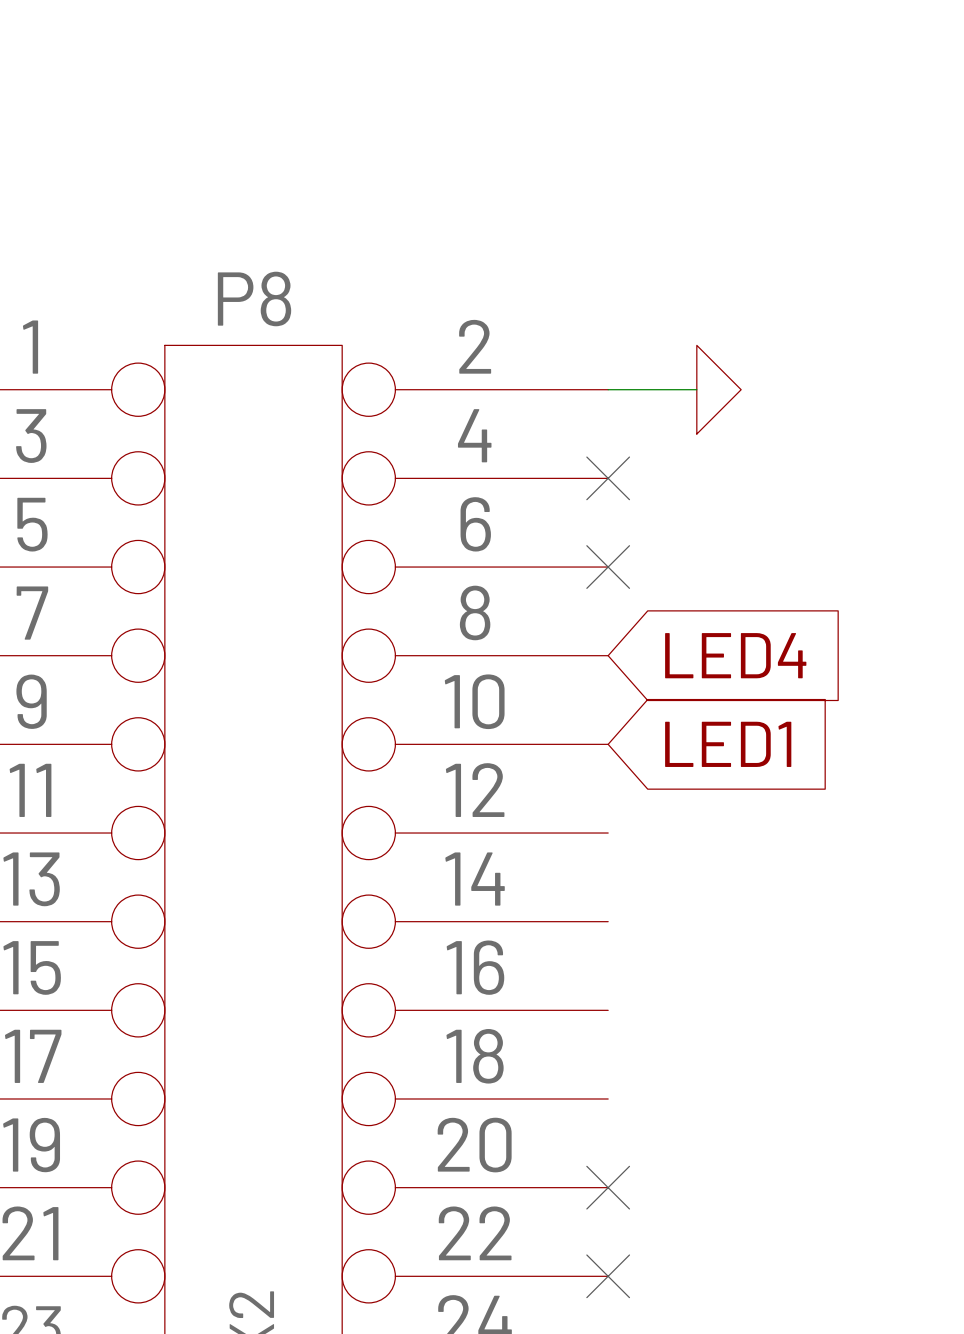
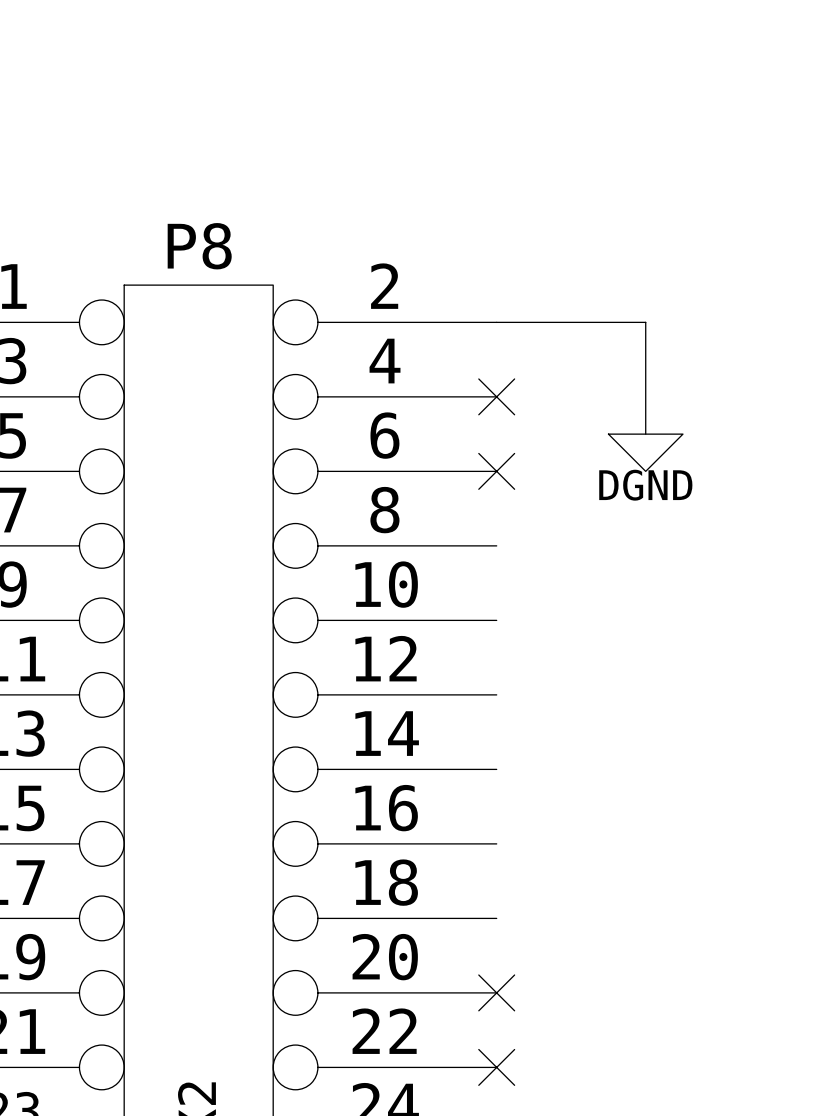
wire: none -> (571, 322) (645, 322) (645, 434)
power symbol: (718, 389) -> none
power symbol: none -> DGND (645, 452)
global label: LED4 (735, 655) -> none
global label: LED1 (728, 744) -> none

